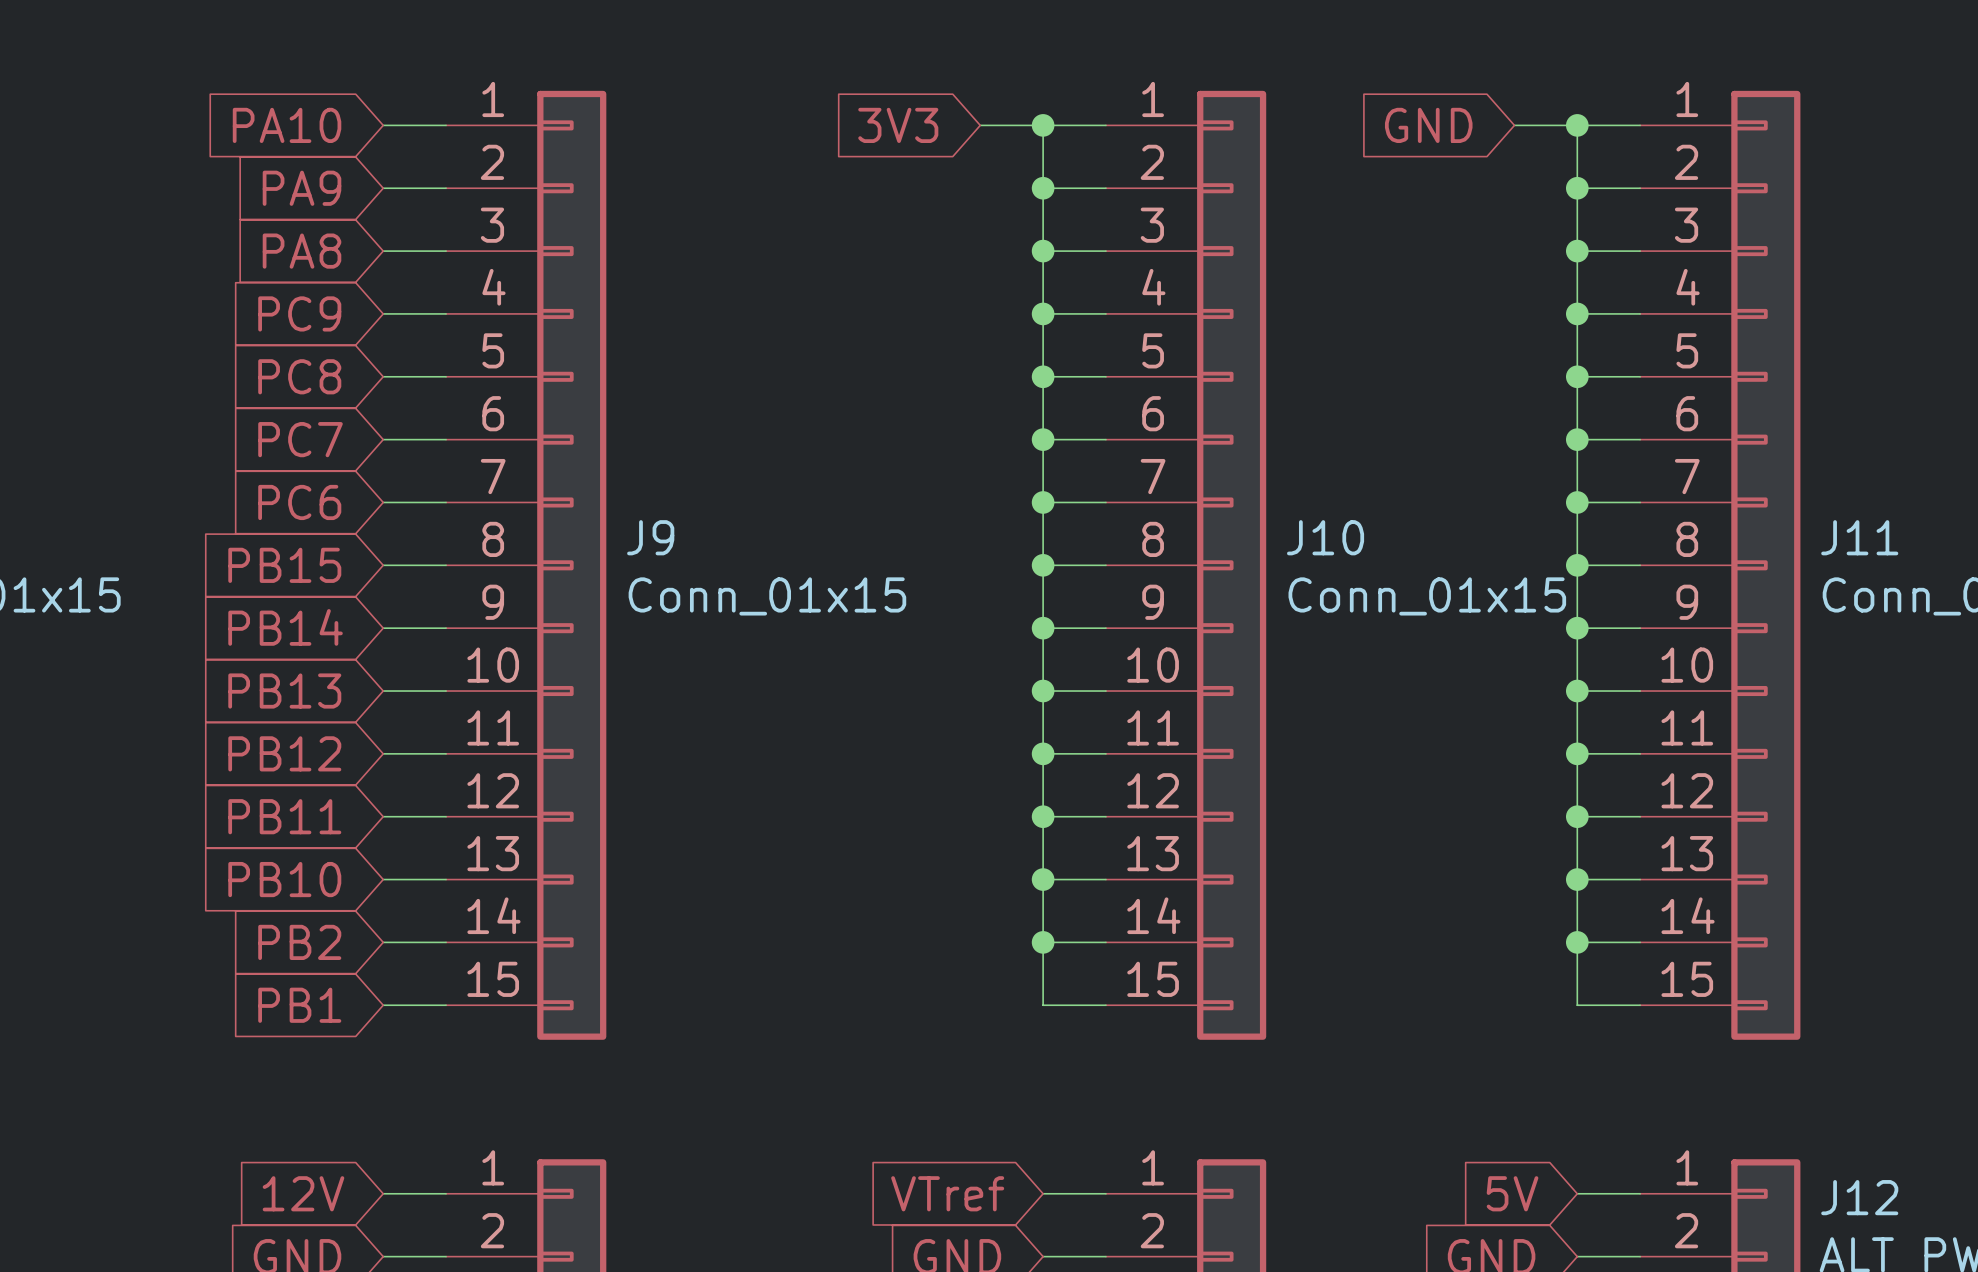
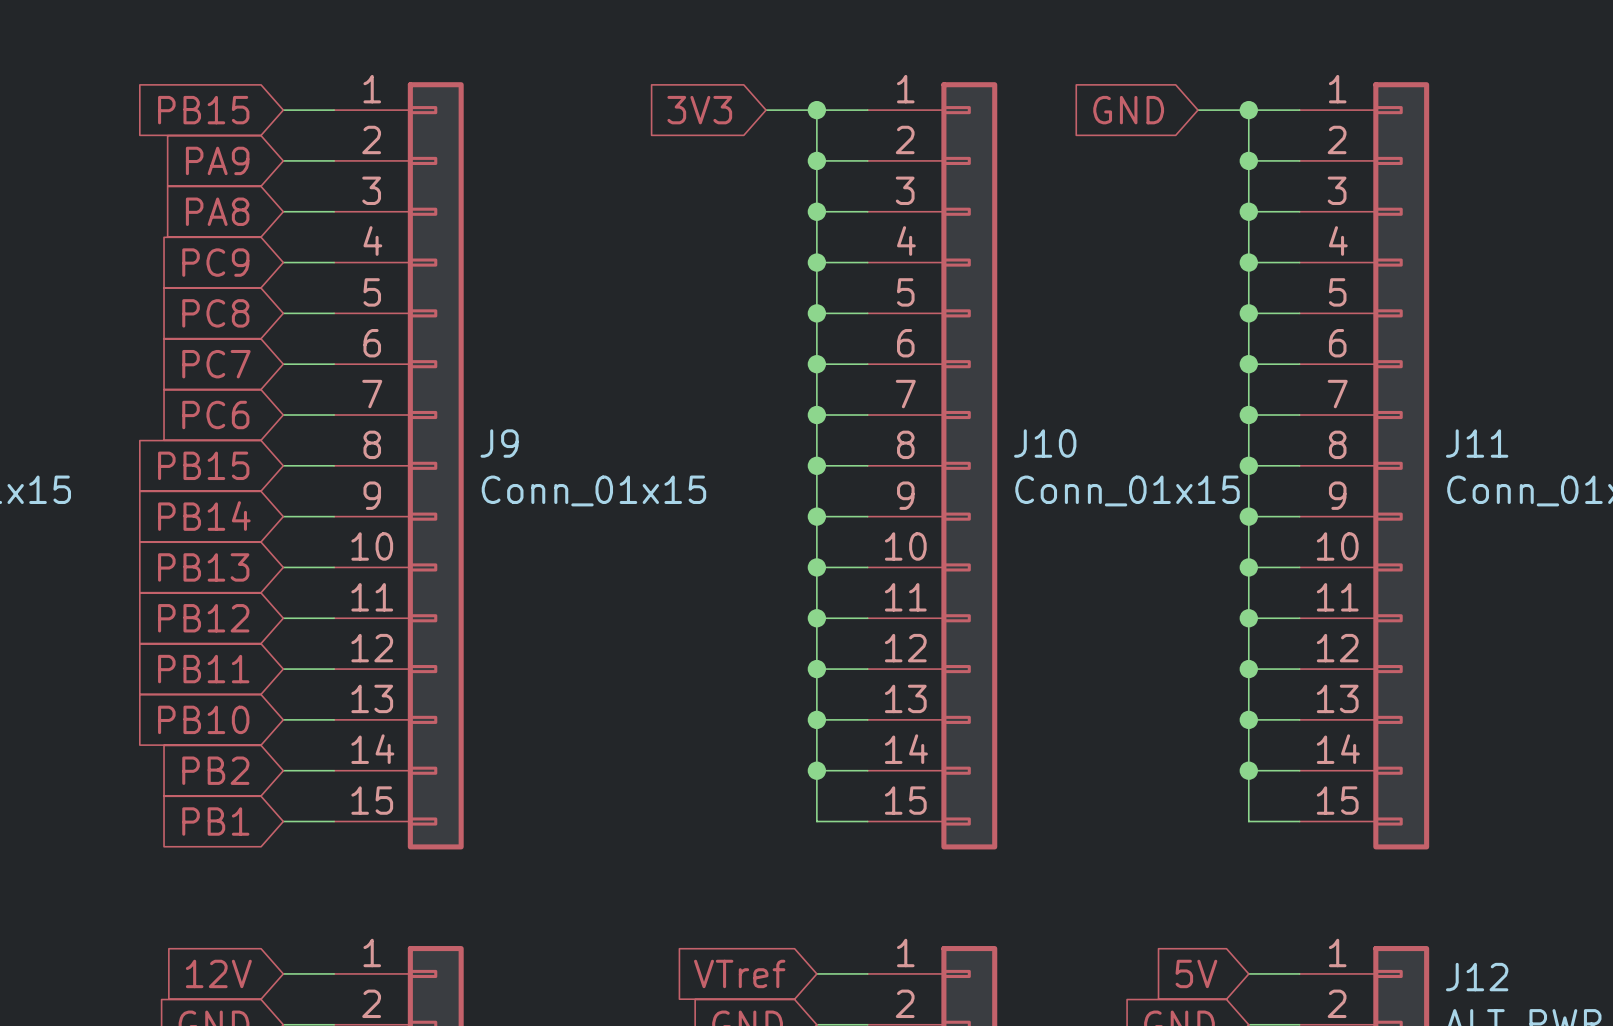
global label: PA10 (287, 125) -> PB15 (203, 110)

